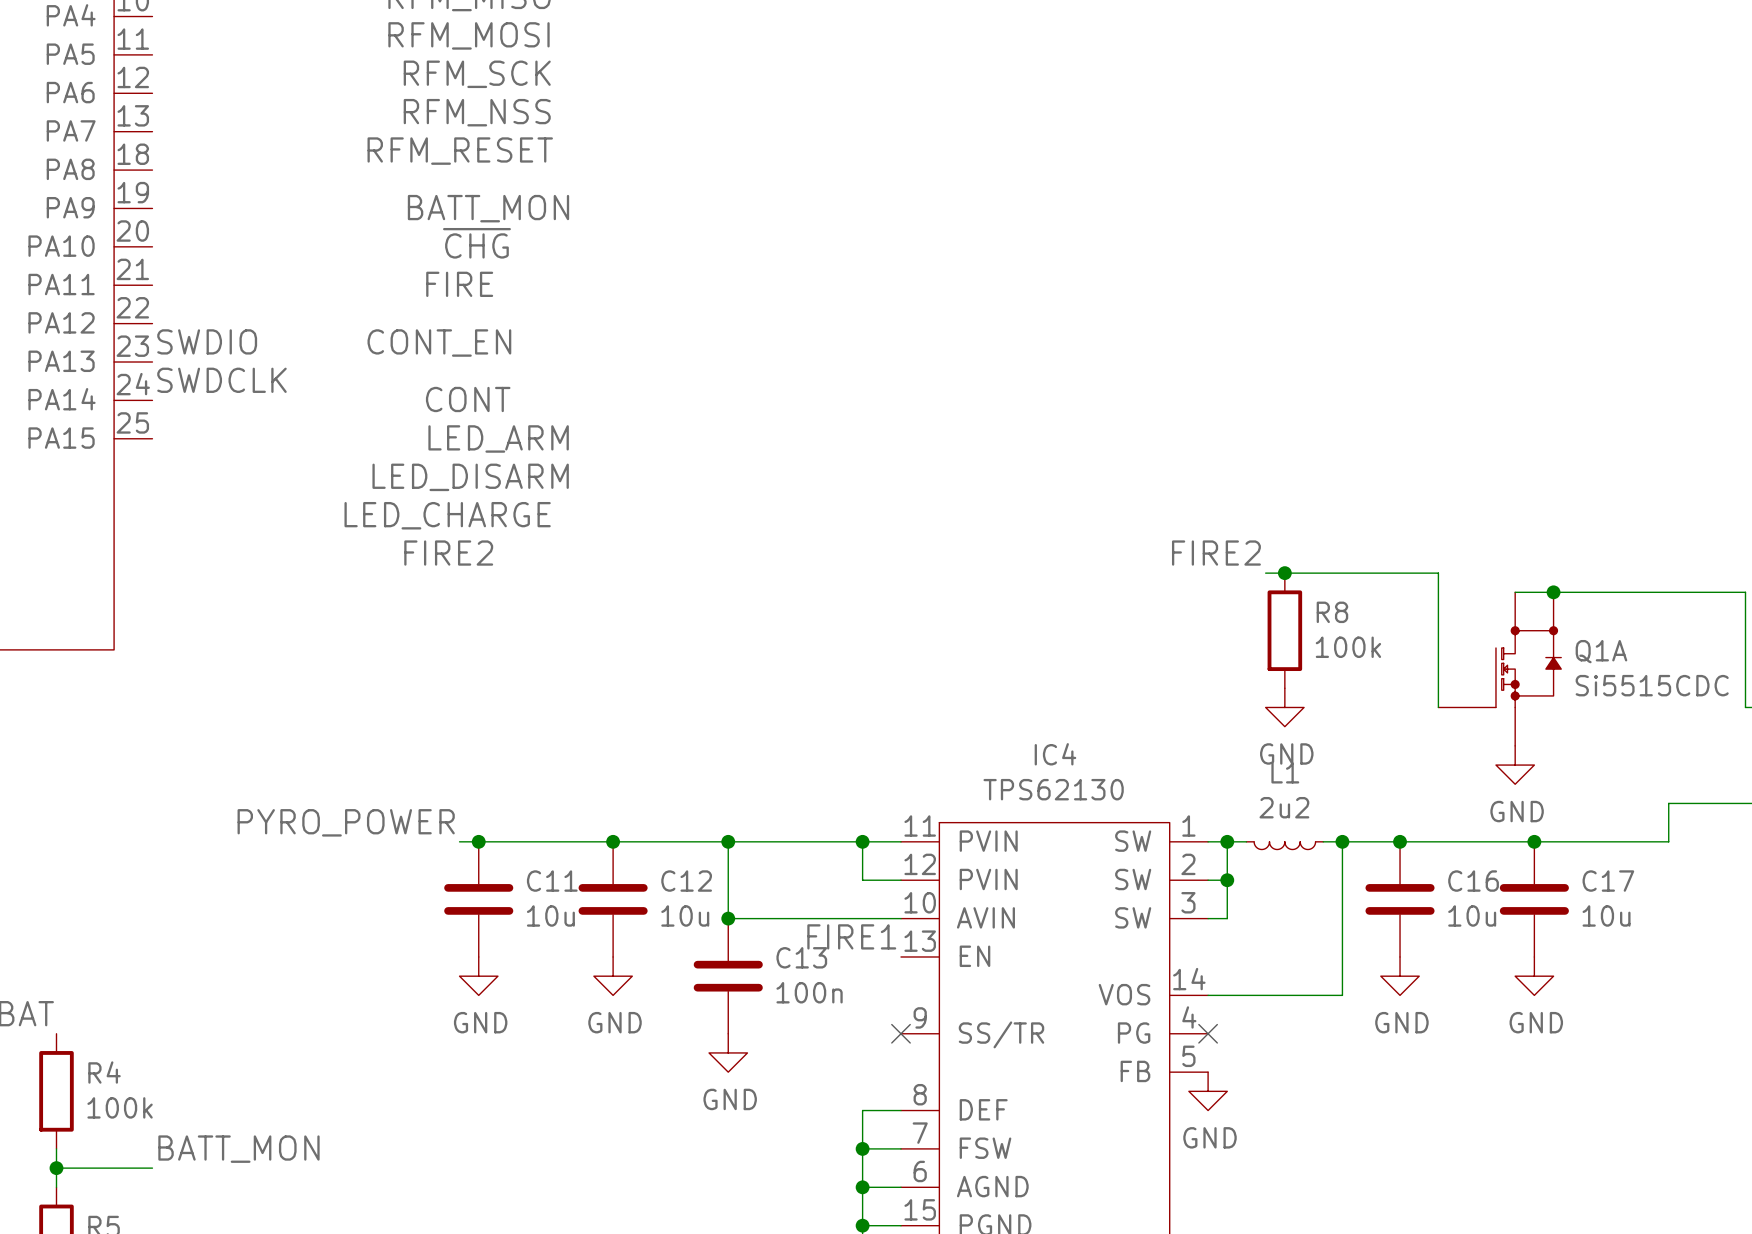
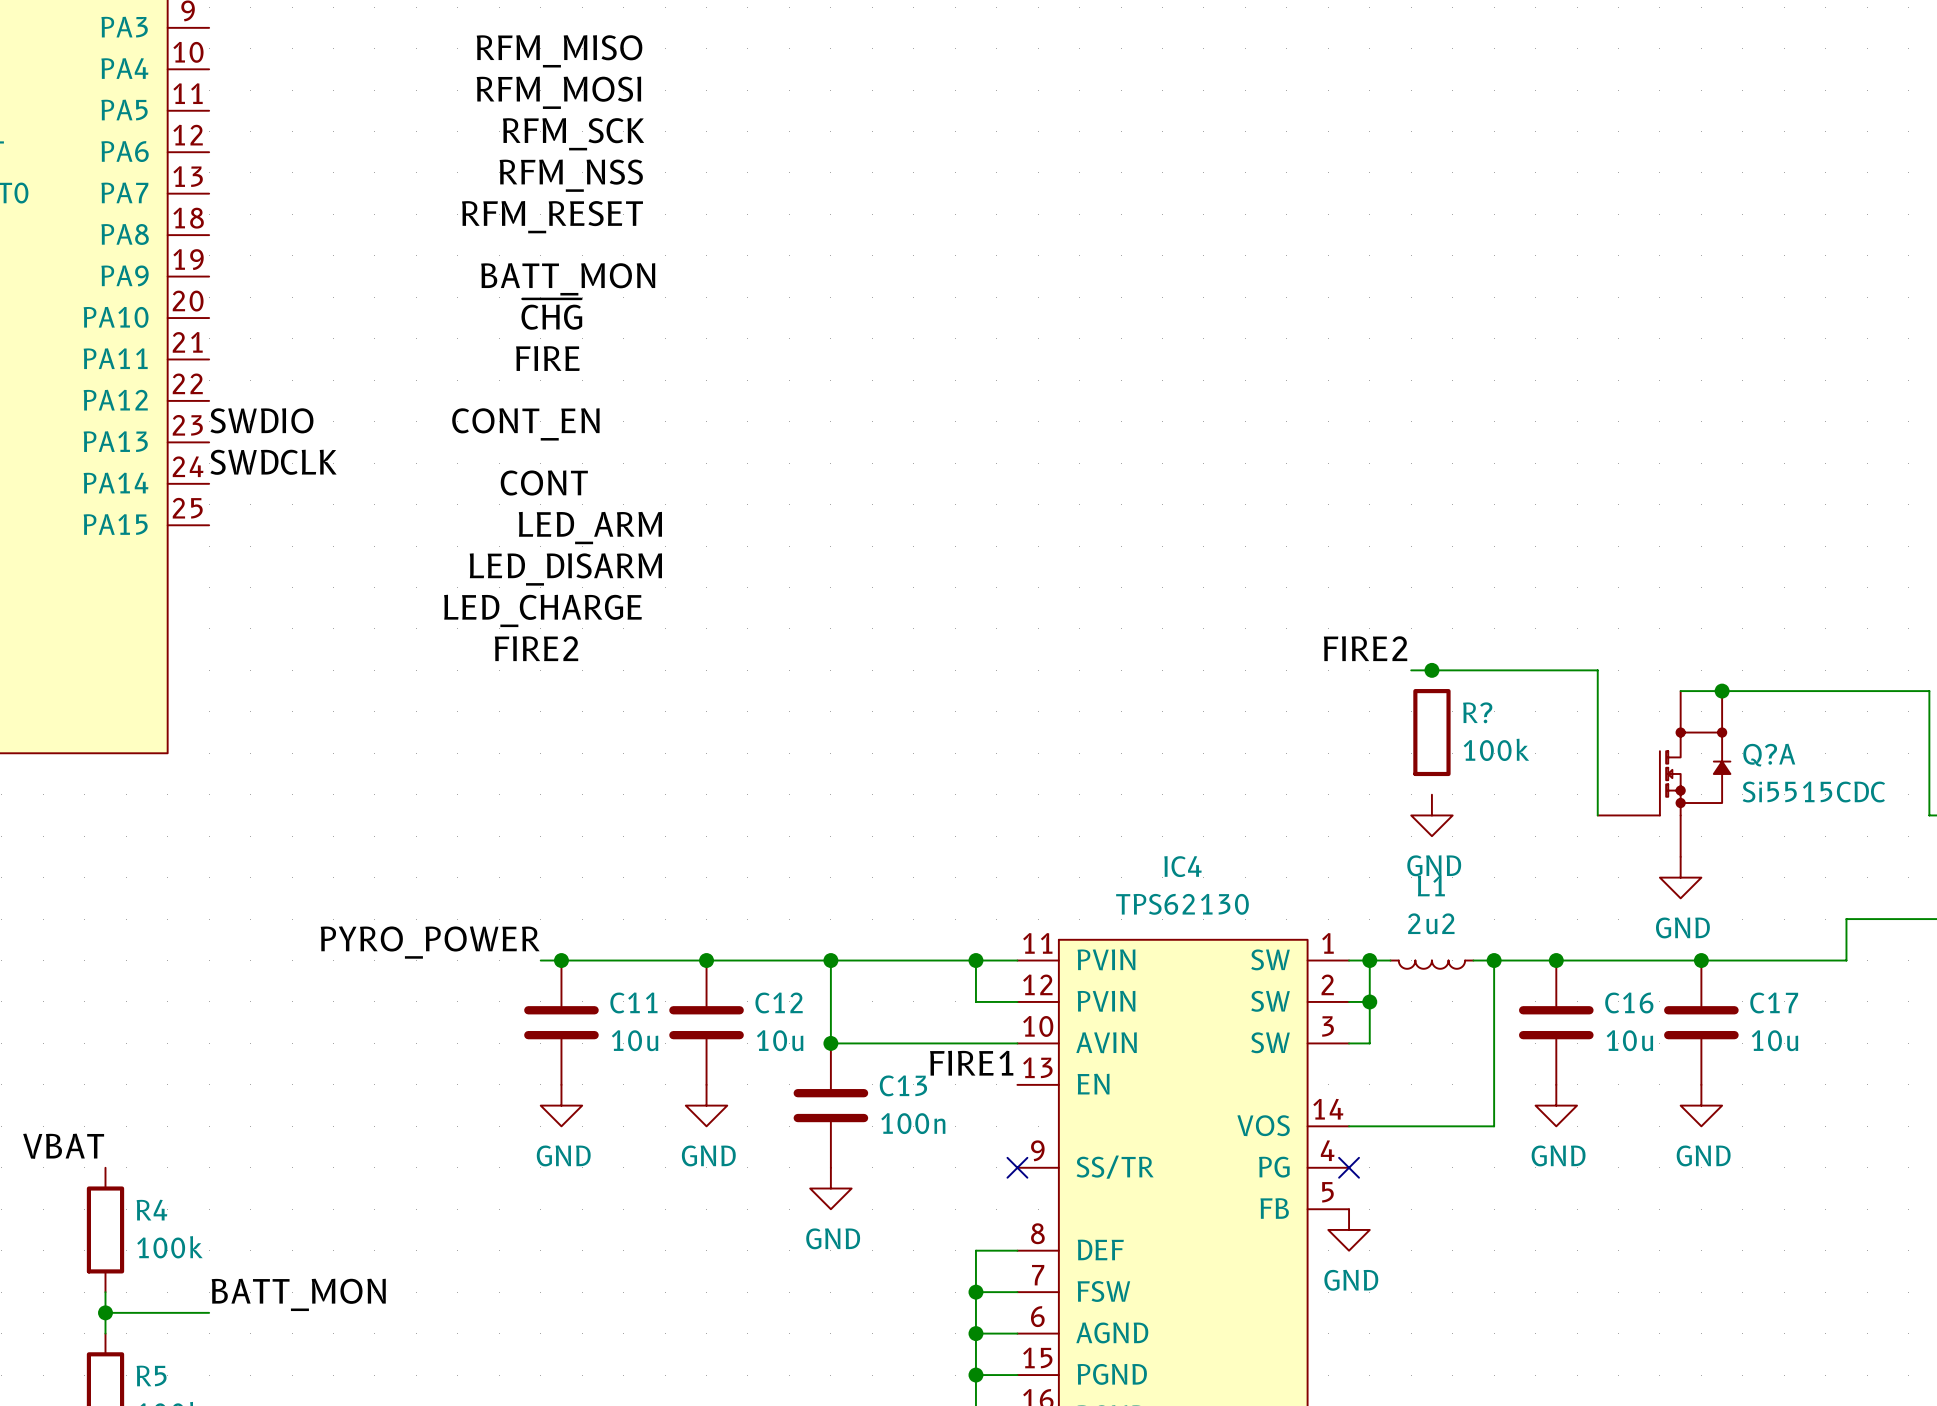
R8: 100k (1284, 630) -> none
R?: none -> 100k (1431, 732)
Q1A name: Q1A (1601, 651) -> Q?A (1769, 755)

